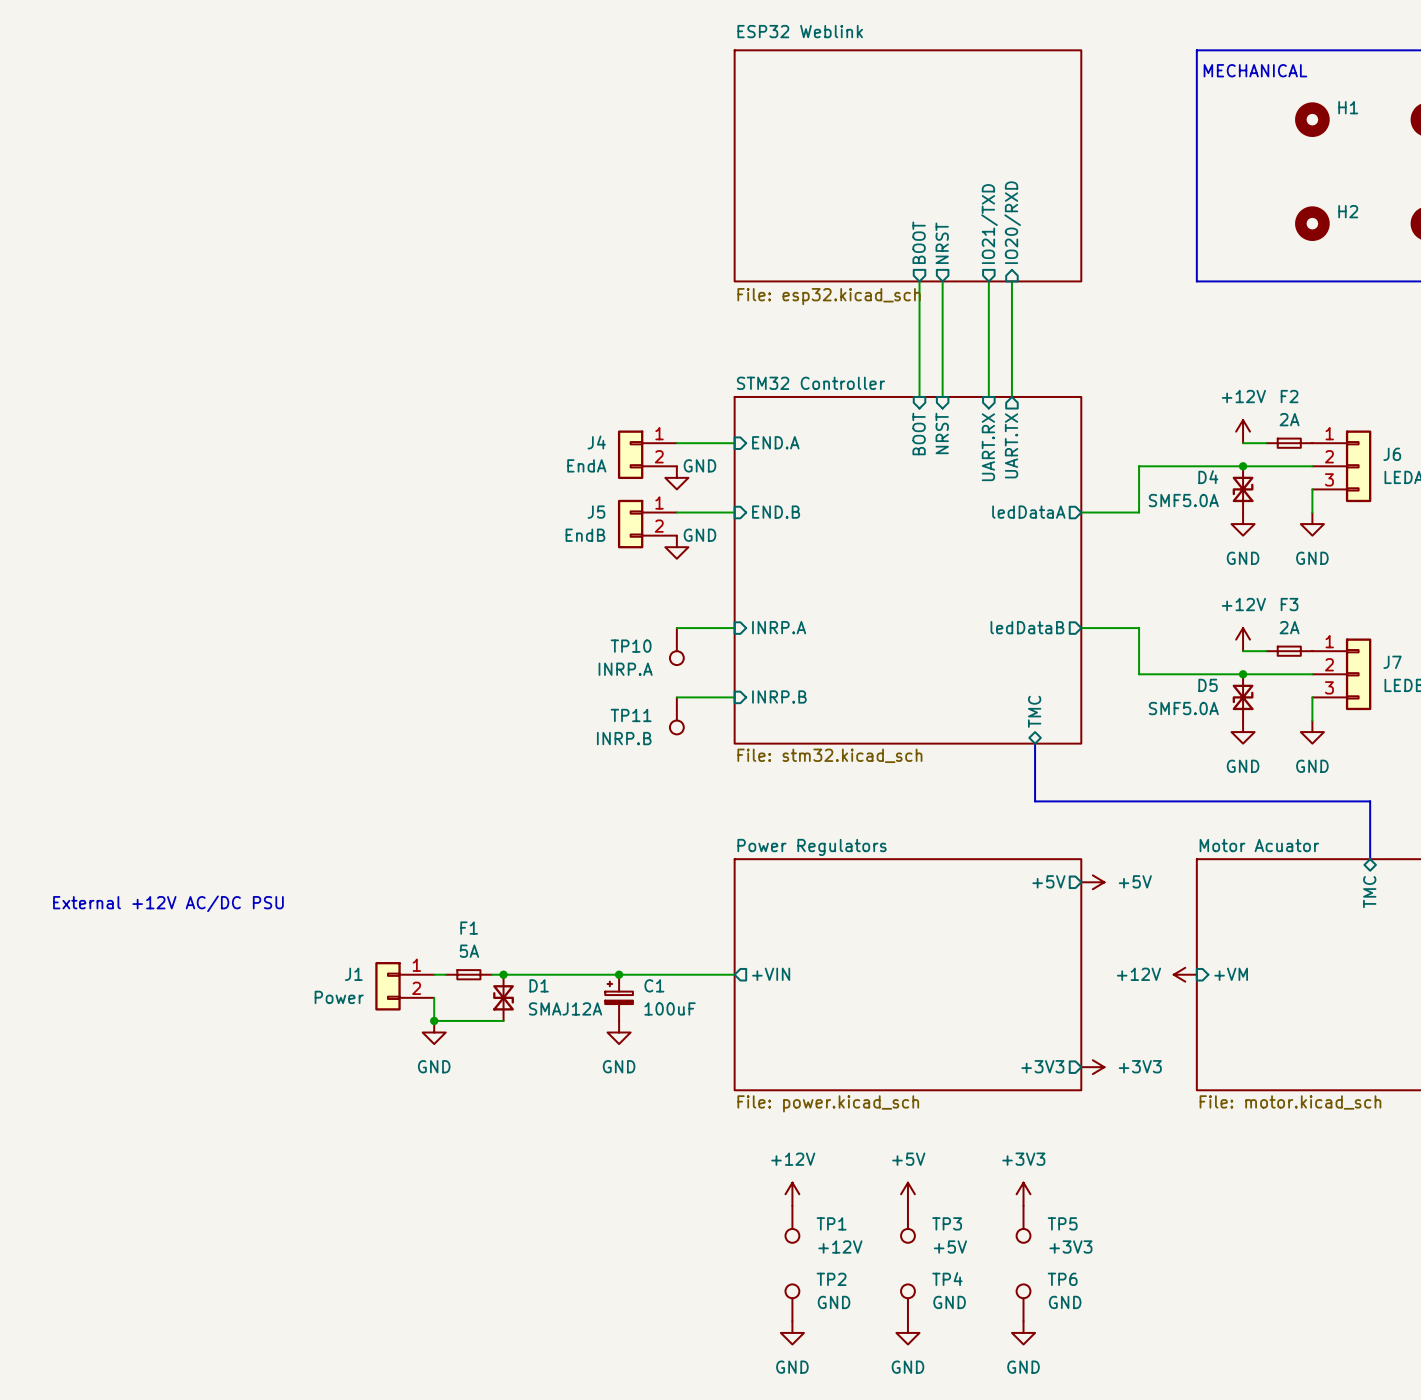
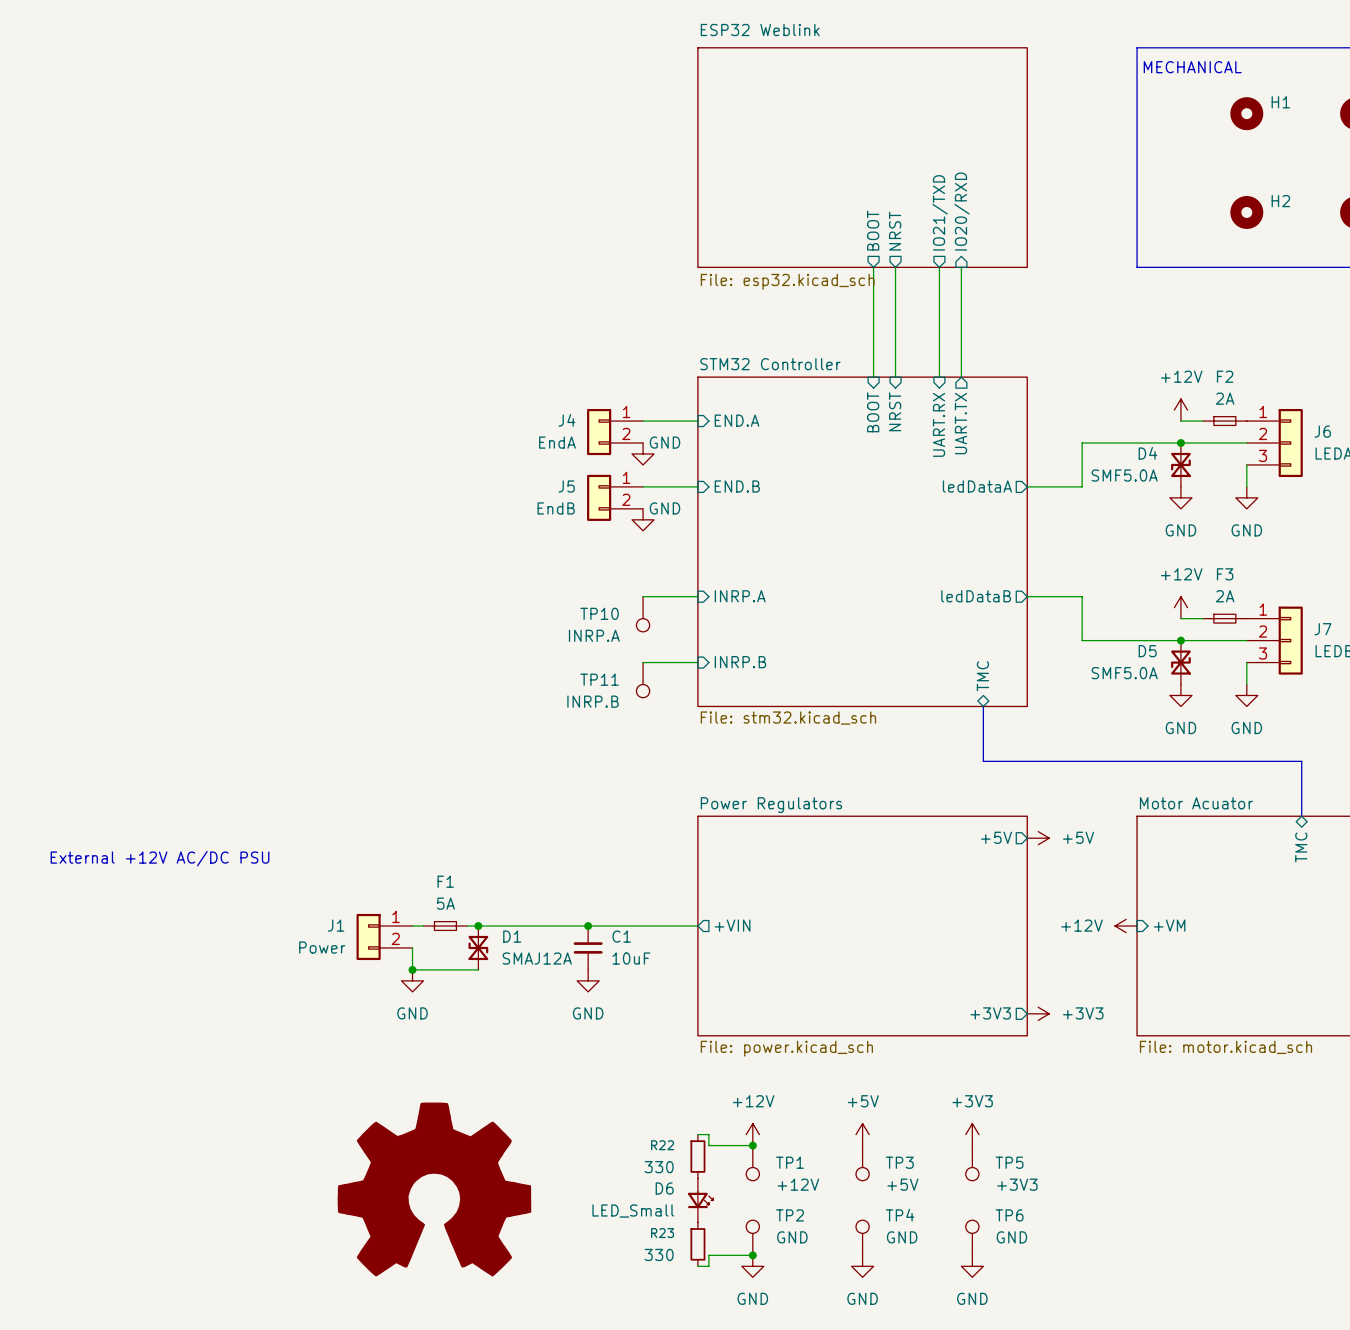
C1 symbol: [605, 974, 633, 1021] -> [573, 926, 603, 970]
C1 value: 100uF (670, 1008) -> 10uF (631, 958)
wire: none -> (697, 1134) (708, 1134) (708, 1145) (752, 1145)
junction: none -> (752, 1145)
R22: none -> 330 (697, 1156)
part: none -> (434, 1189)
D6: none -> LED_Small (700, 1200)
R23: none -> 330 (697, 1244)
wire: none -> (752, 1255) (708, 1255) (708, 1266) (697, 1266)
junction: none -> (752, 1255)

